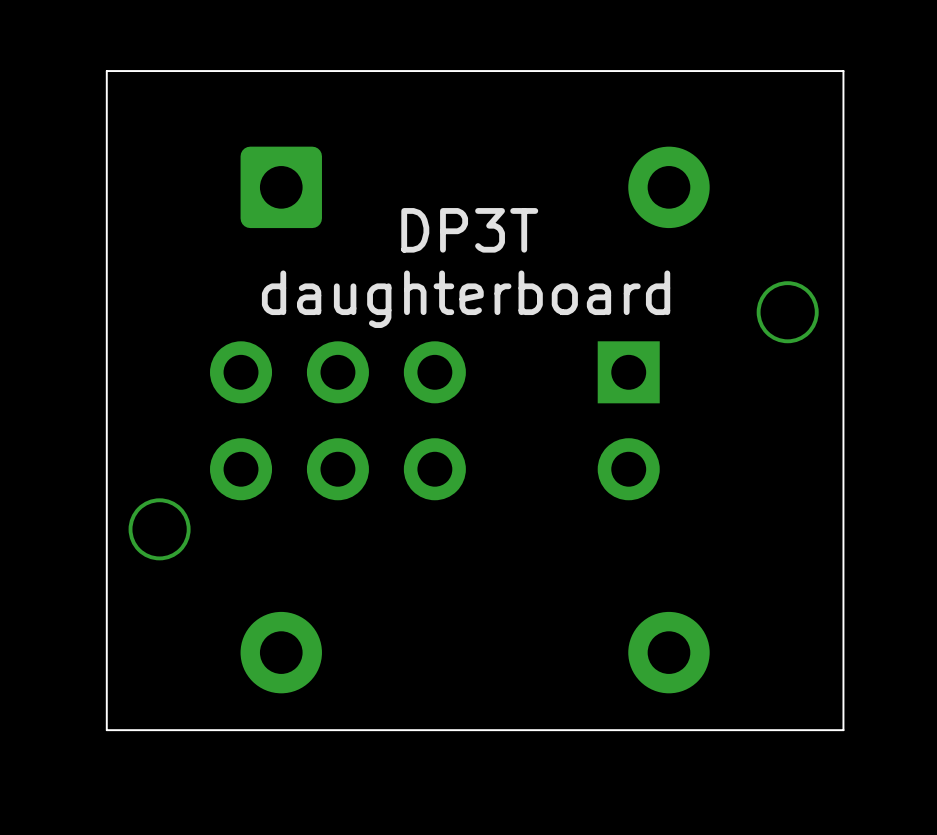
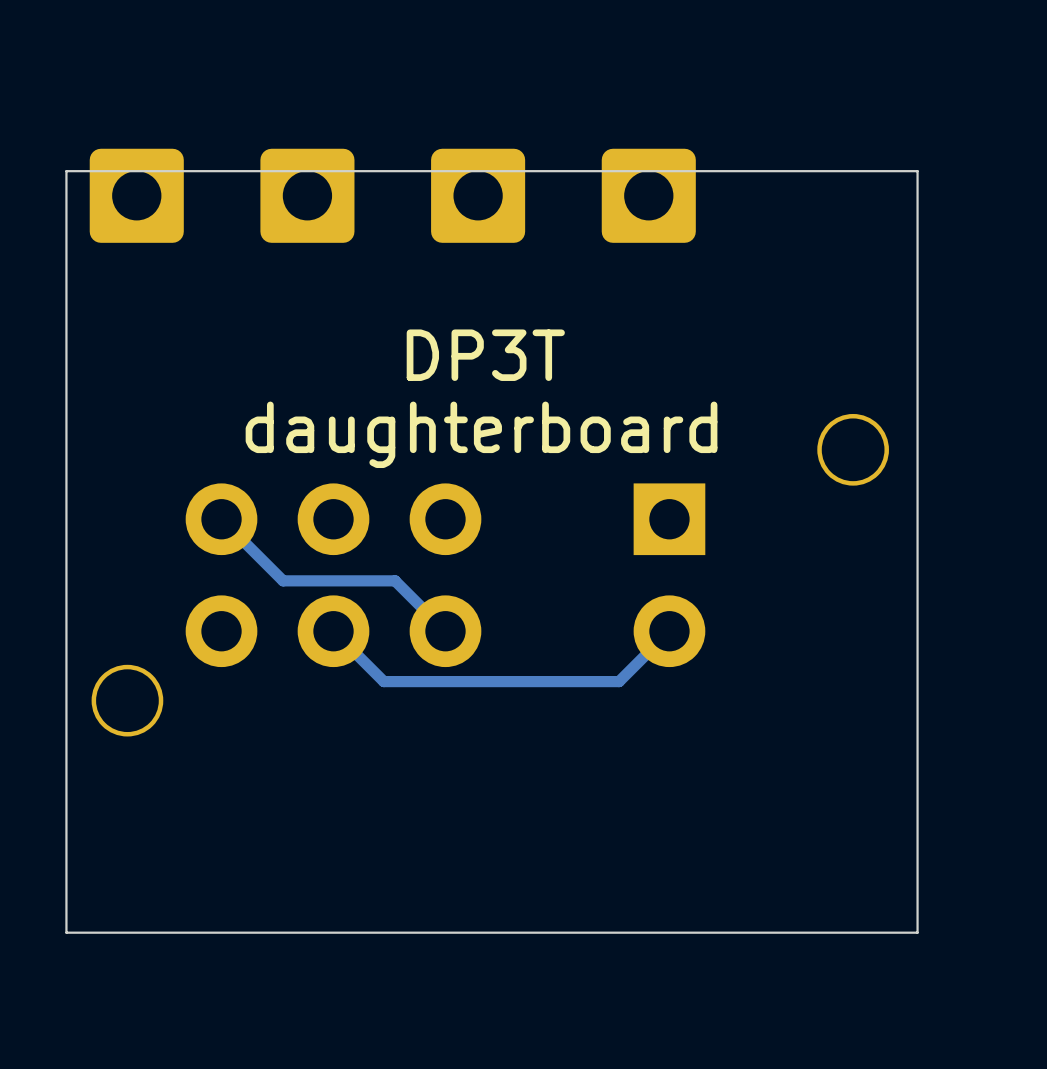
part: none -> (136, 195)
part: none -> (307, 195)
part: none -> (478, 195)
part: none -> (648, 195)
part: (281, 187) -> none
part: (668, 187) -> none
track: none -> (221, 519) (283, 580) (395, 580) (445, 631)
track: none -> (669, 631) (619, 681) (383, 681) (333, 631)
part: (281, 652) -> none
part: (668, 652) -> none

